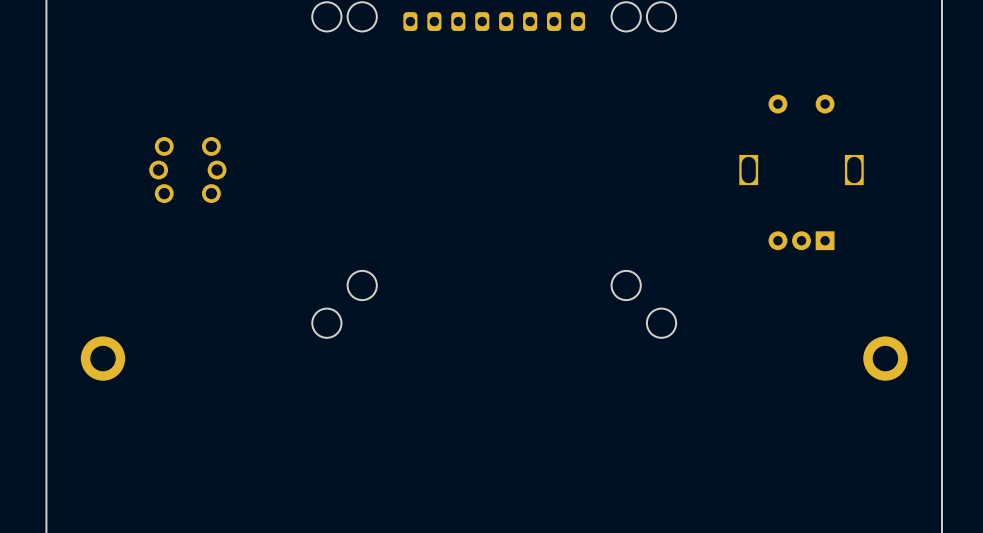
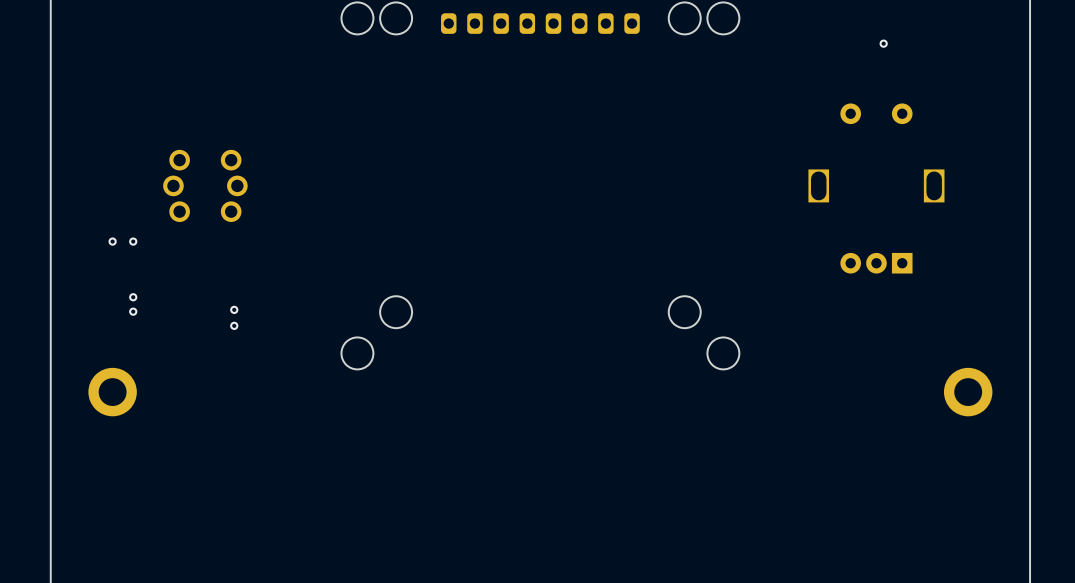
via: none -> (883, 43)
via: none -> (112, 241)
via: none -> (133, 241)
via: none -> (133, 297)
via: none -> (234, 309)
via: none -> (133, 311)
via: none -> (234, 325)

